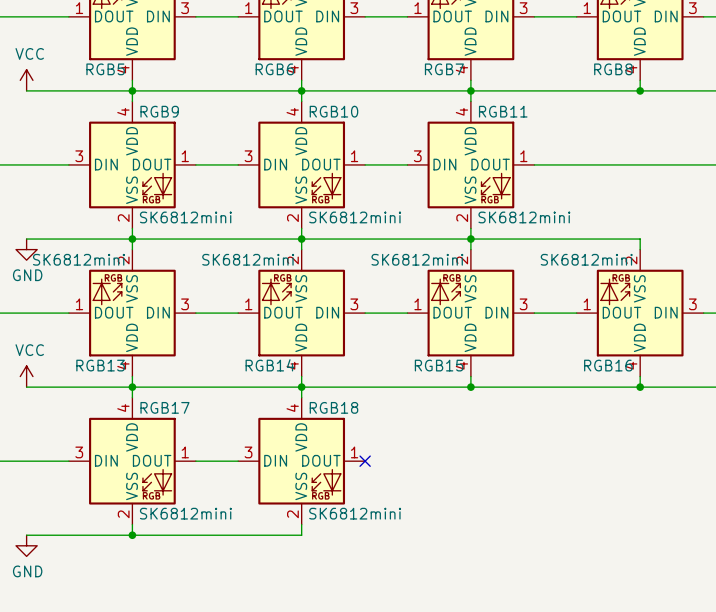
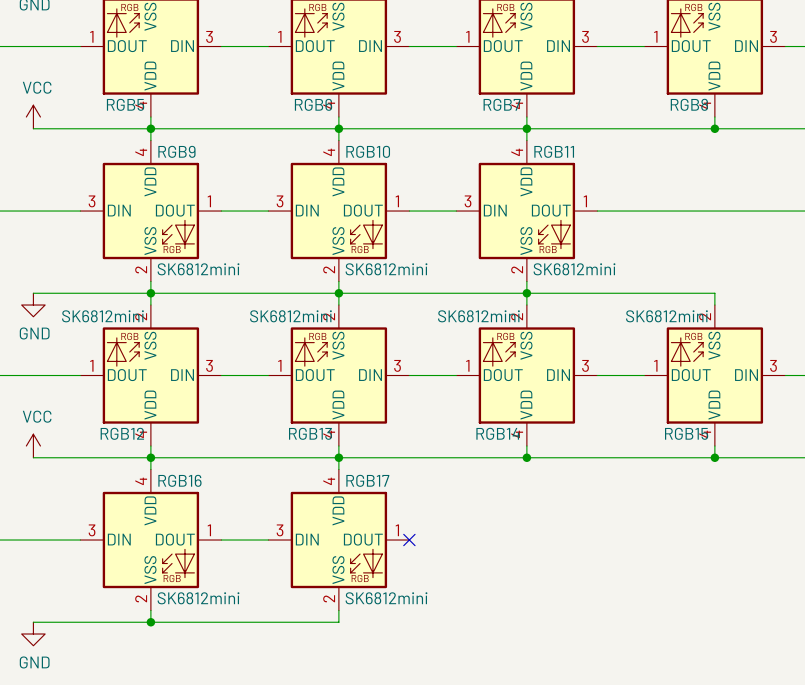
RGB13 name: RGB13 (100, 365) -> RGB12 (122, 433)
RGB14 name: RGB14 (270, 365) -> RGB13 (310, 433)
RGB15 name: RGB15 (439, 365) -> RGB14 (498, 433)
RGB16 name: RGB16 (608, 365) -> RGB15 (686, 433)
RGB17 name: RGB17 (164, 407) -> RGB16 (179, 480)
RGB18 name: RGB18 (333, 407) -> RGB17 (367, 480)

